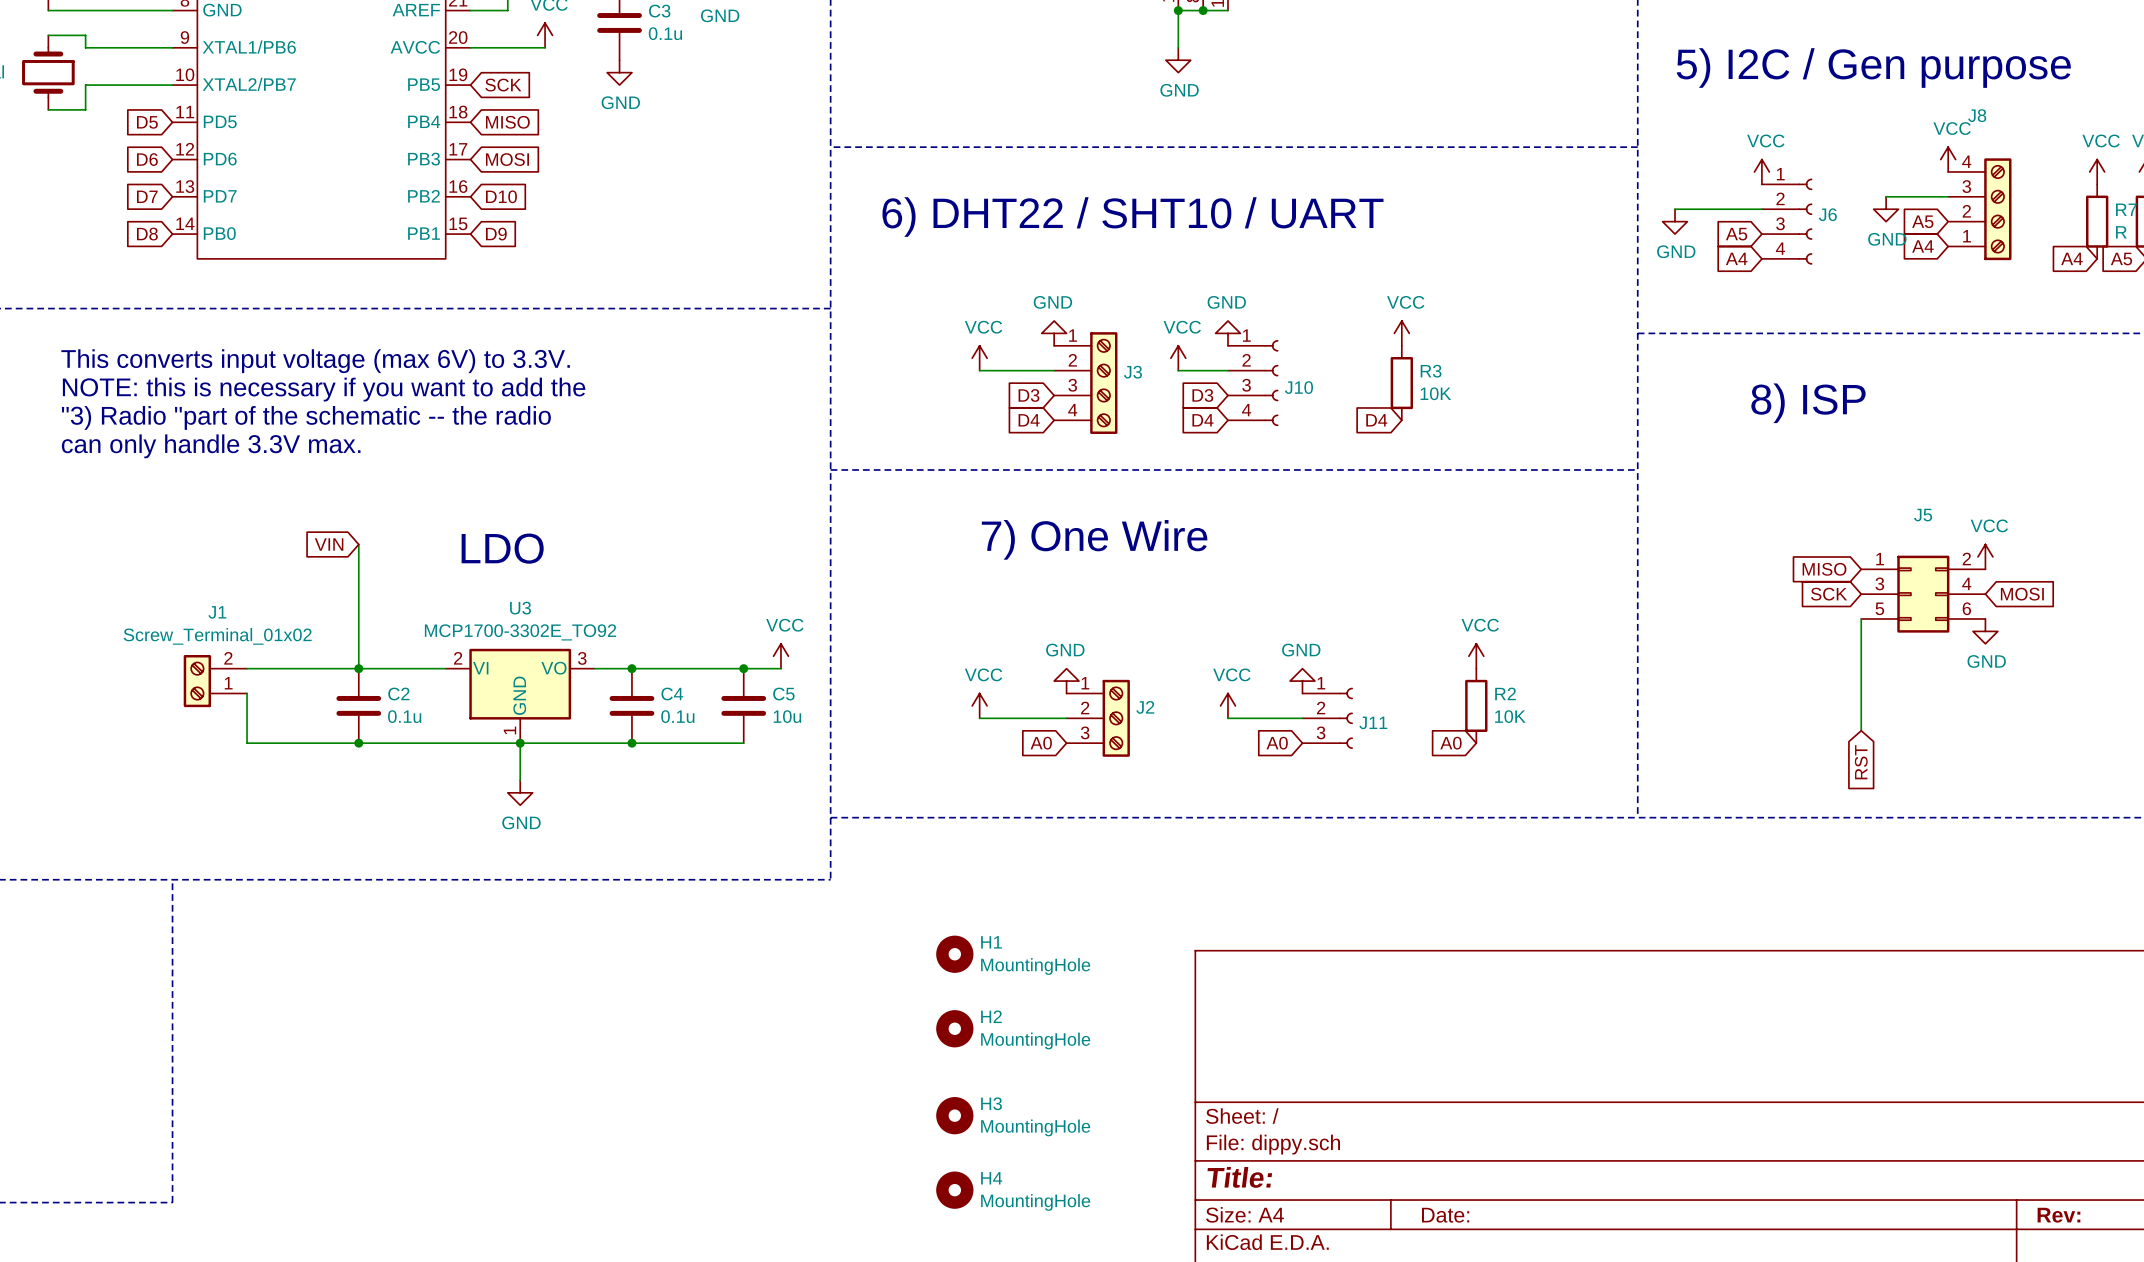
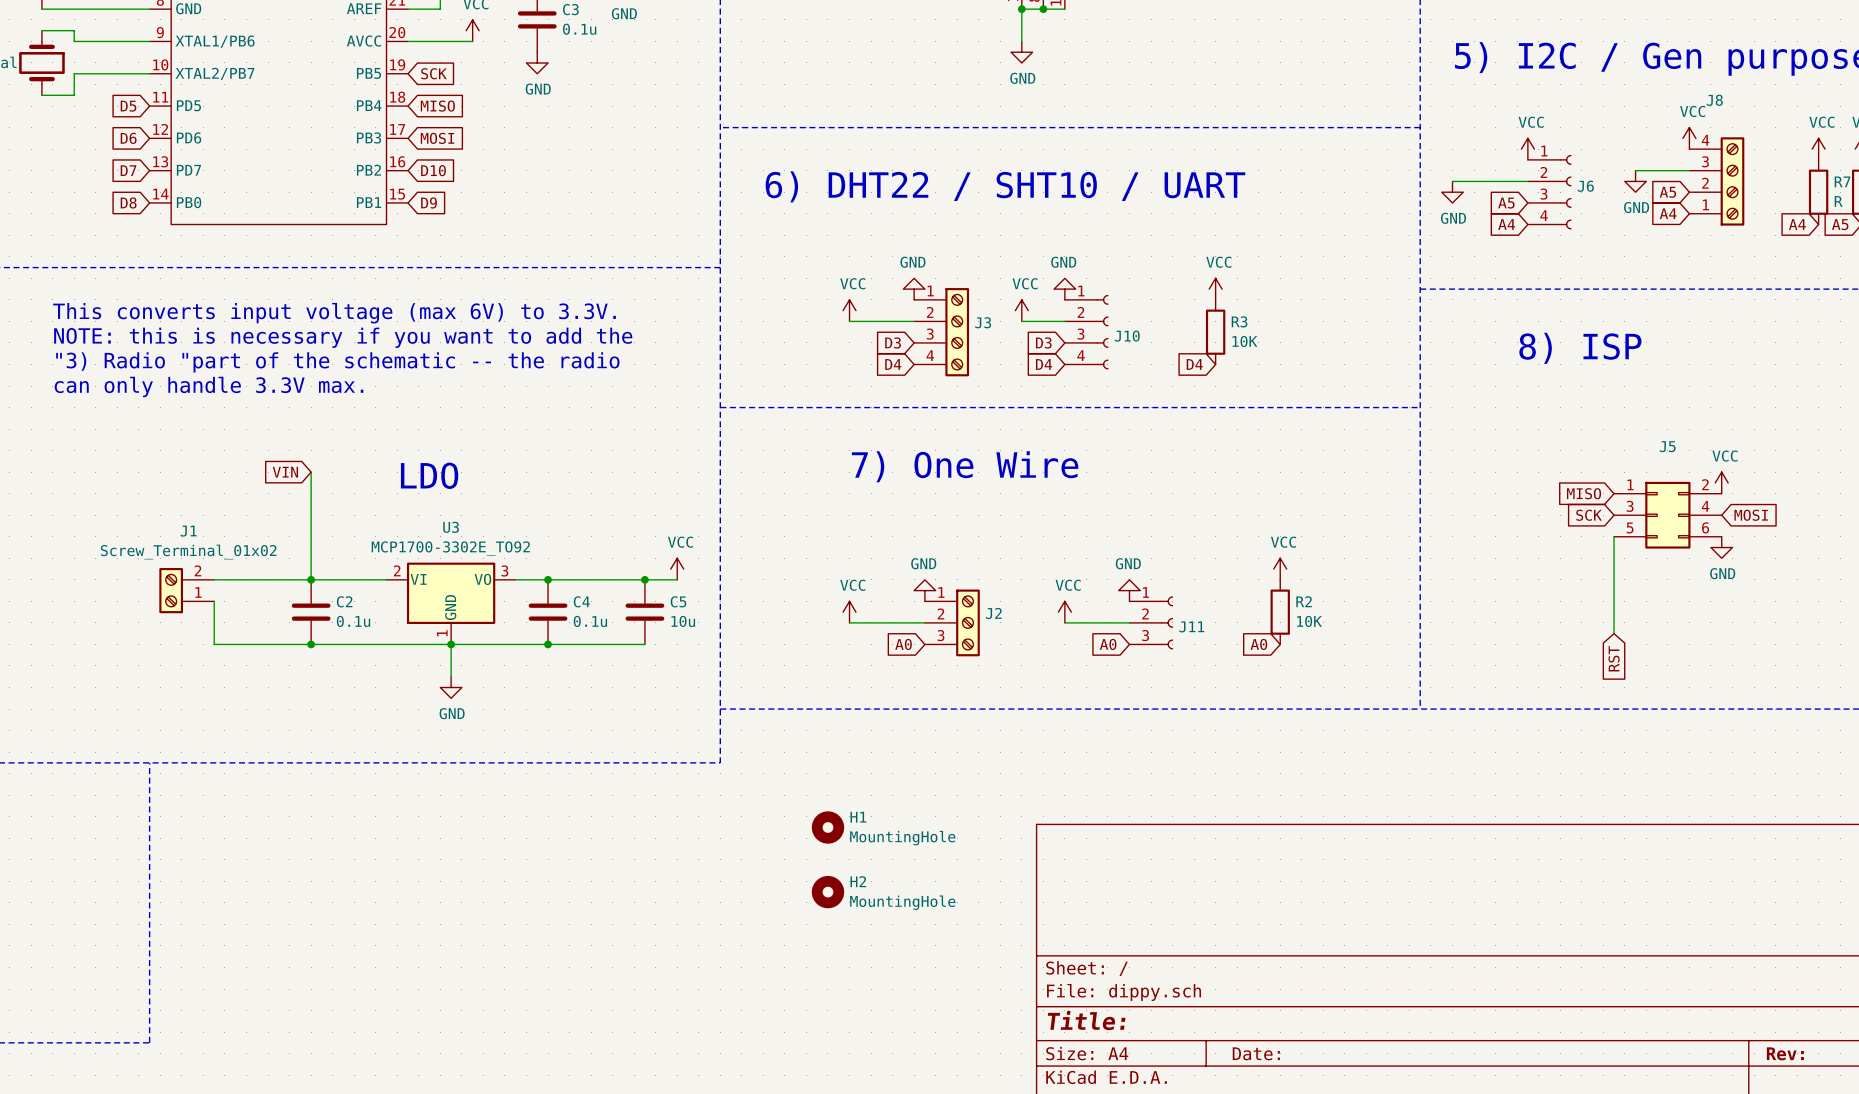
H3: MountingHole (954, 1115) -> none
H4: MountingHole (954, 1190) -> none

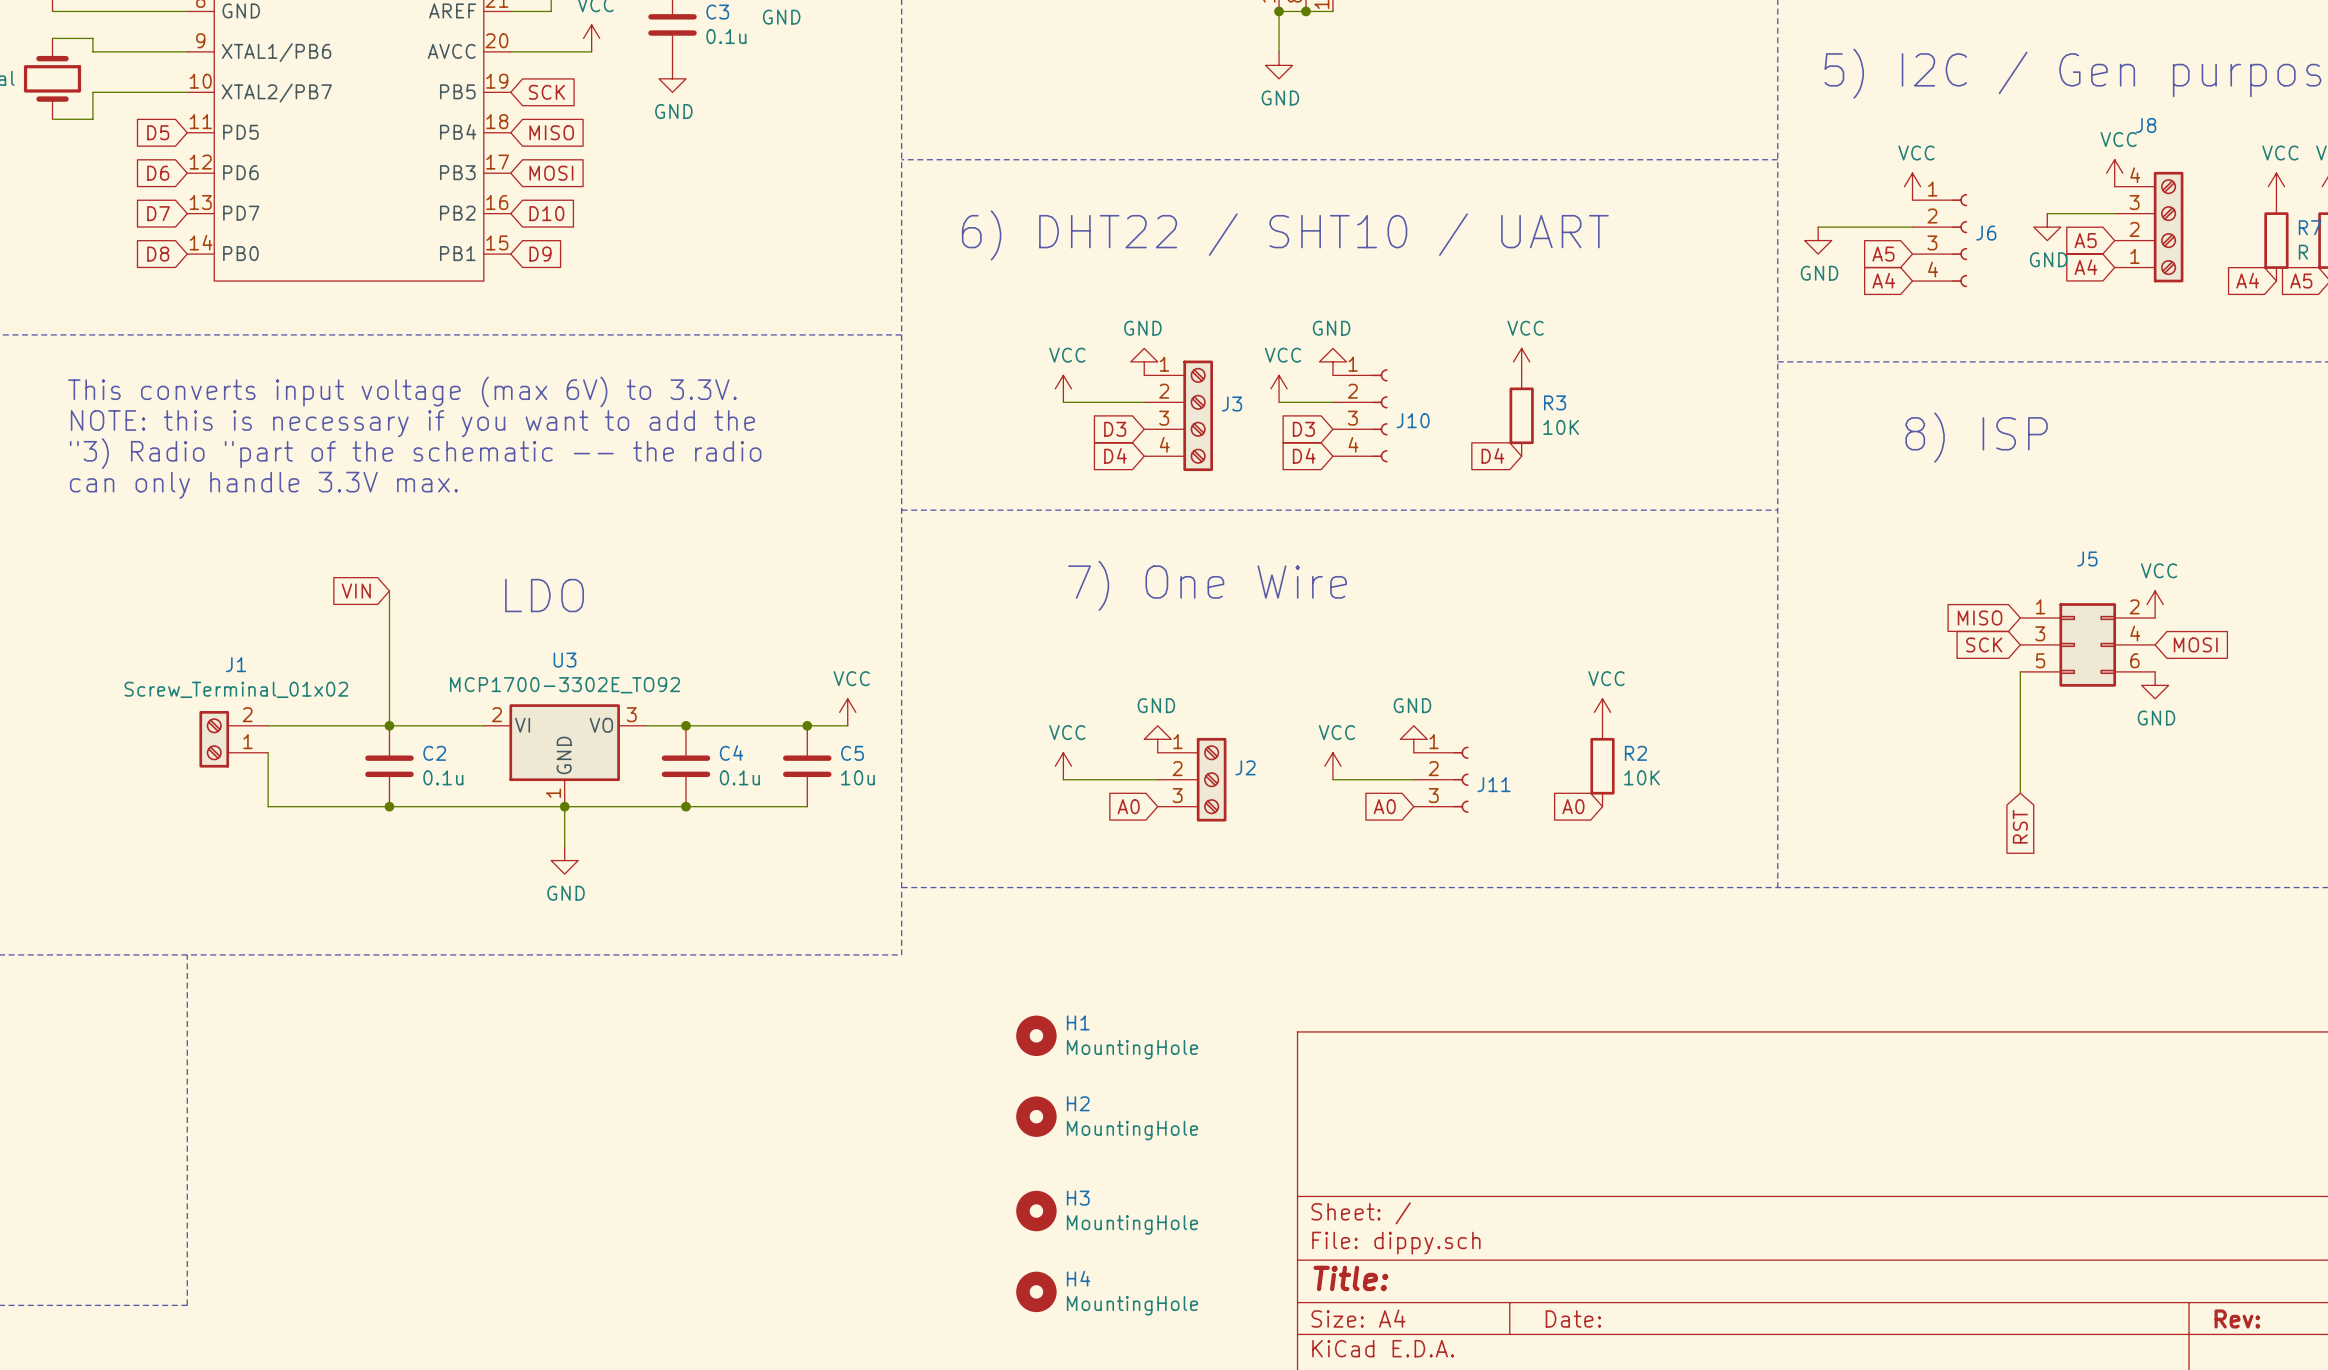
H3: none -> MountingHole (1036, 1211)
H4: none -> MountingHole (1036, 1291)

